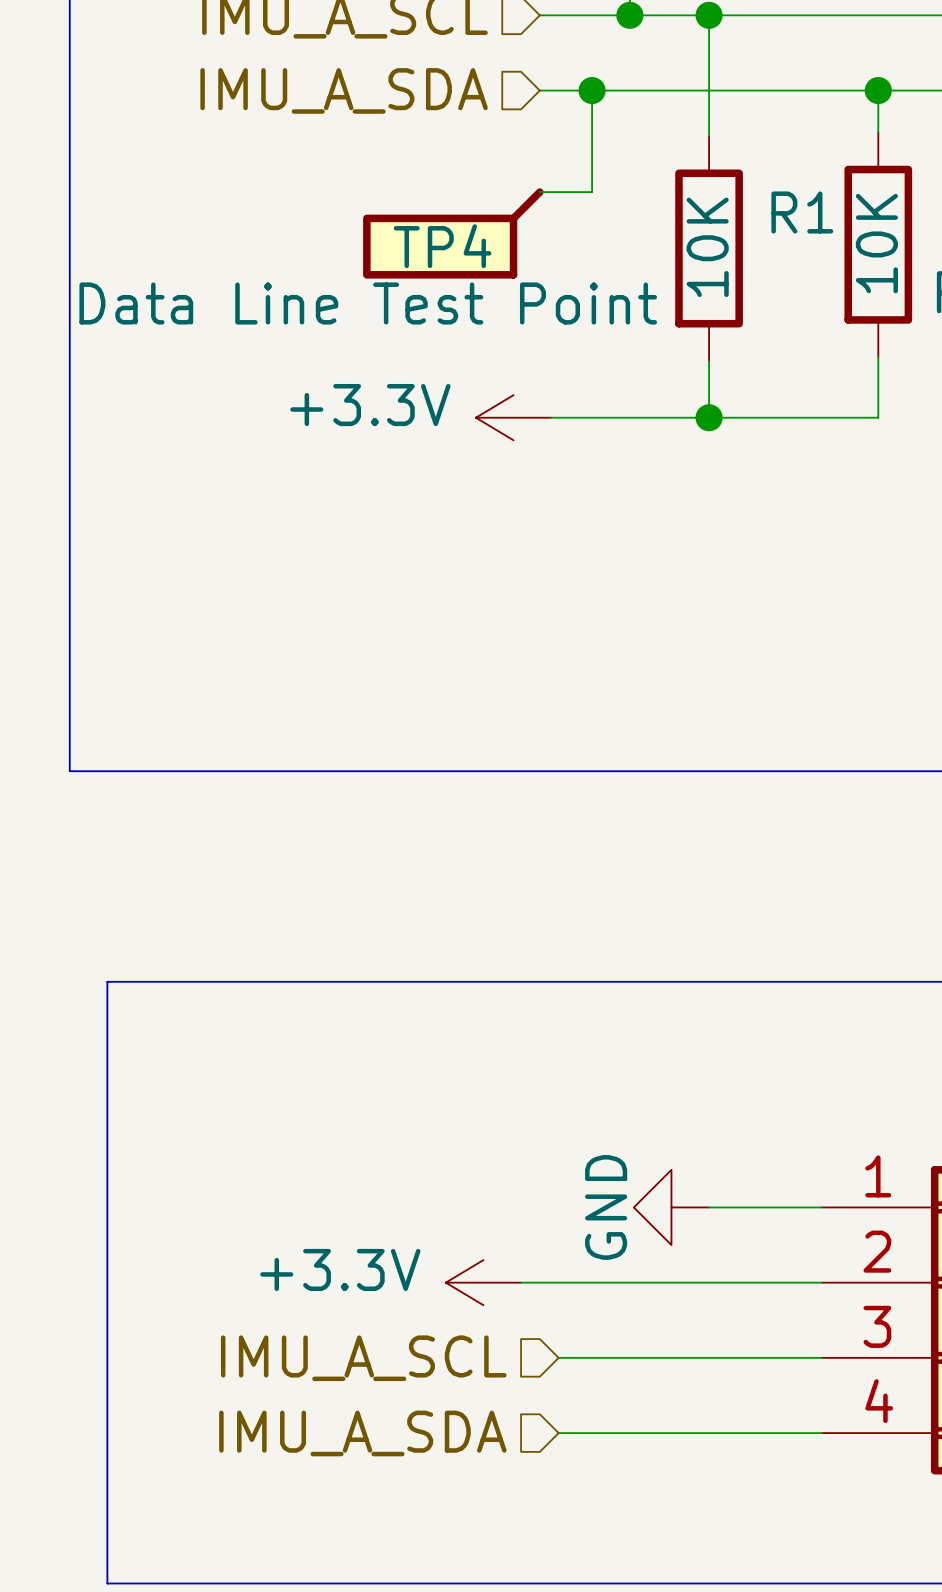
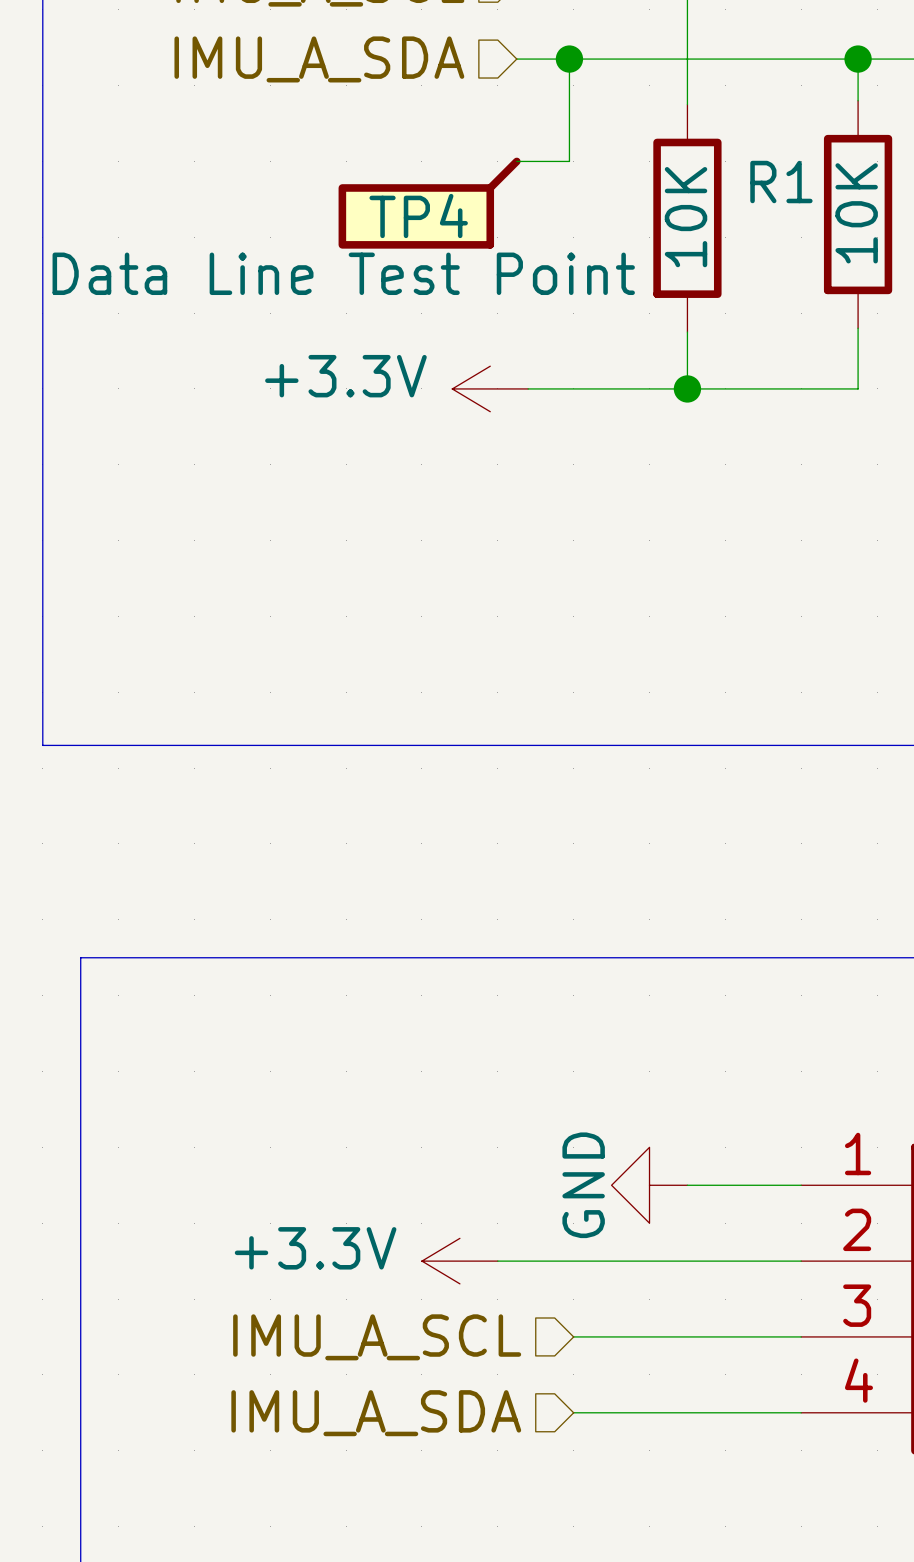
wire: (558, 1357) (596, 1357) -> none
hierarchical label position: IMU_A_SCL (363, 1358) -> IMU_A_SCL (377, 1337)
hierarchical label position: IMU_A_SDA (362, 1433) -> IMU_A_SDA (376, 1413)
wire: (558, 1433) (596, 1433) -> none

